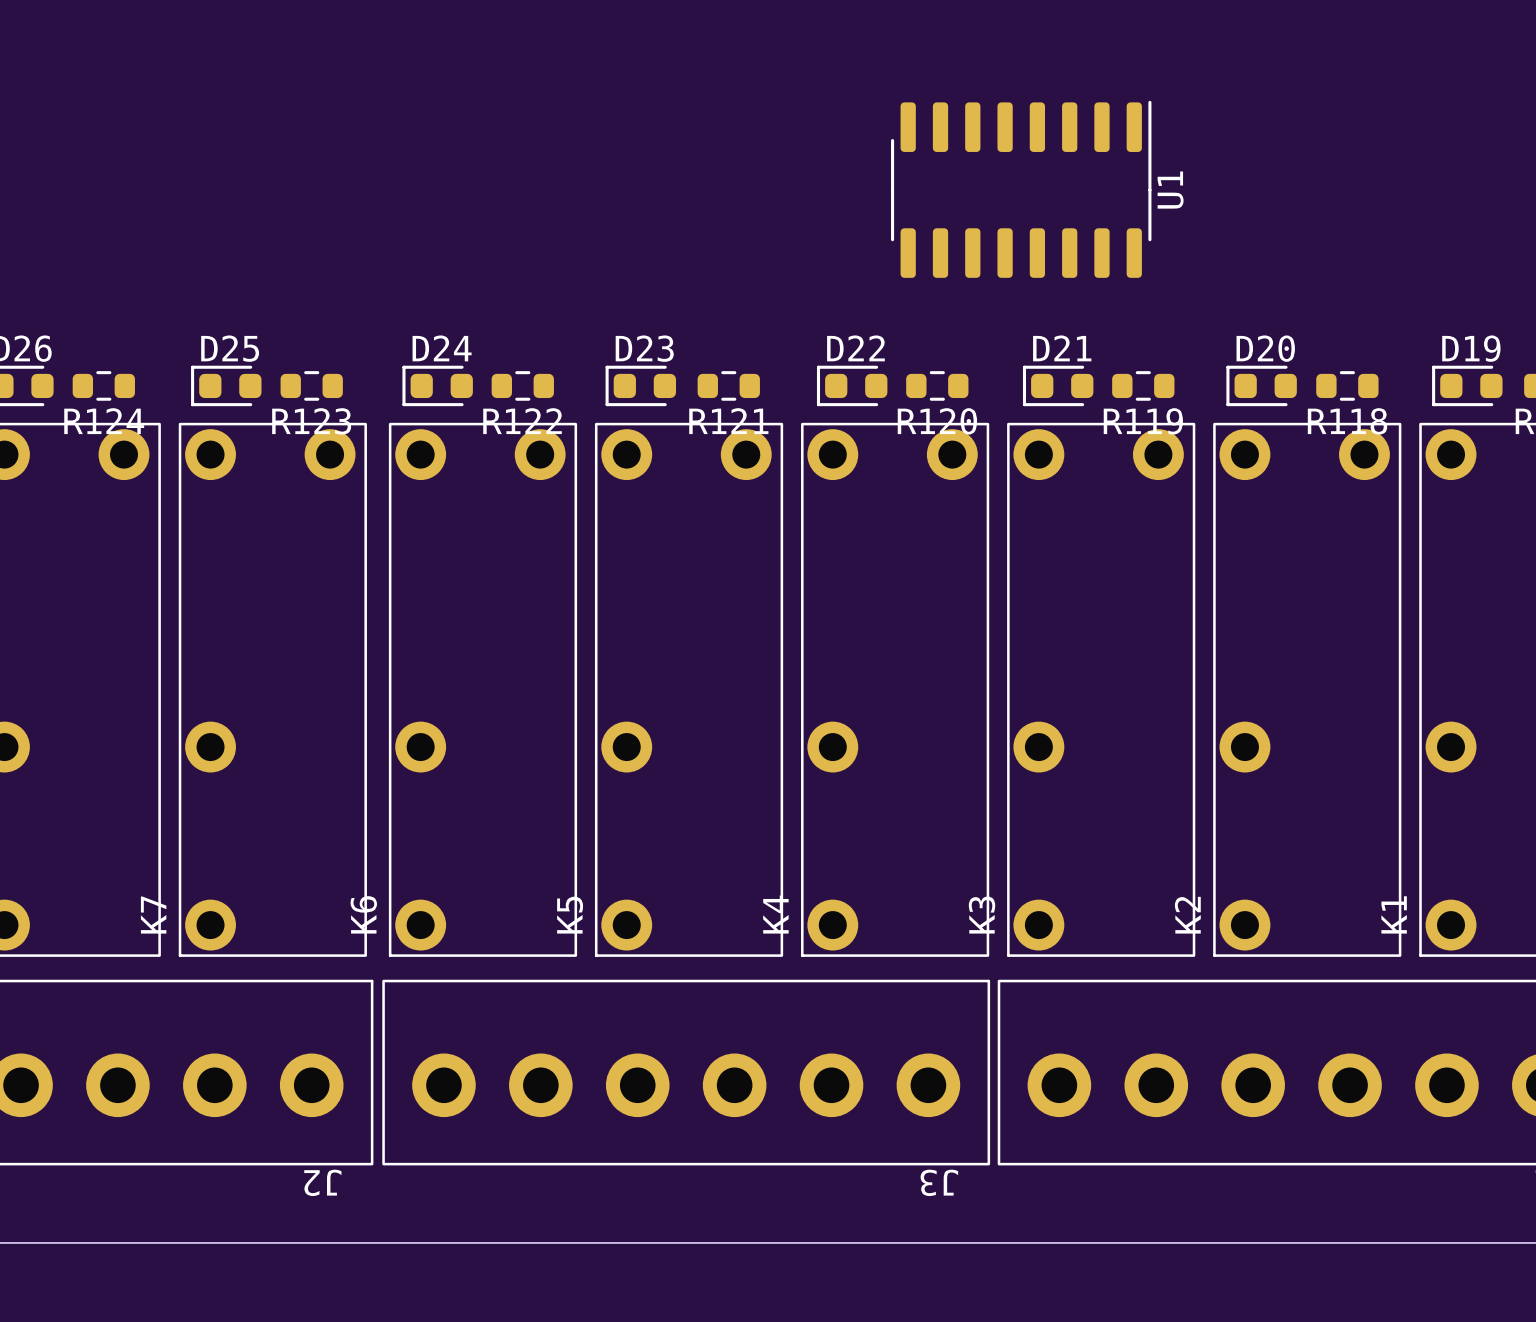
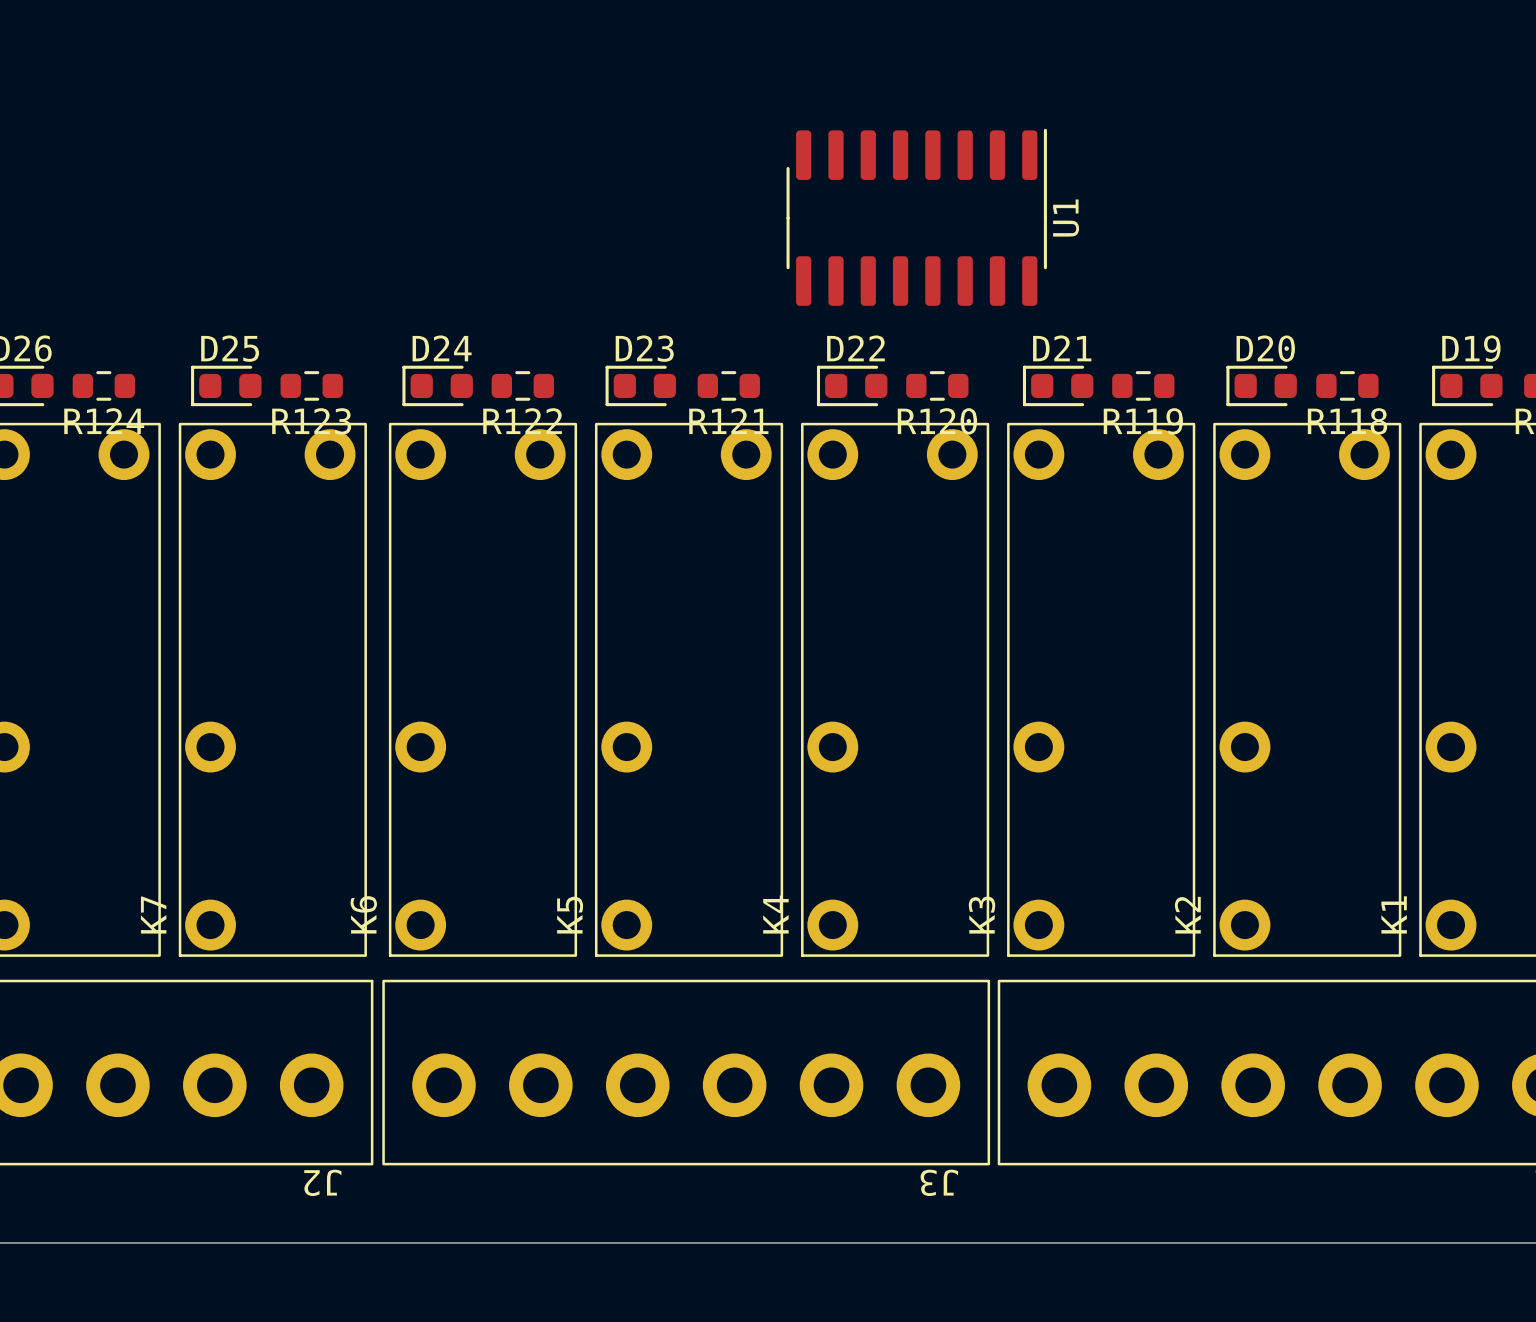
U1 position: (1021, 189) -> (916, 217)

